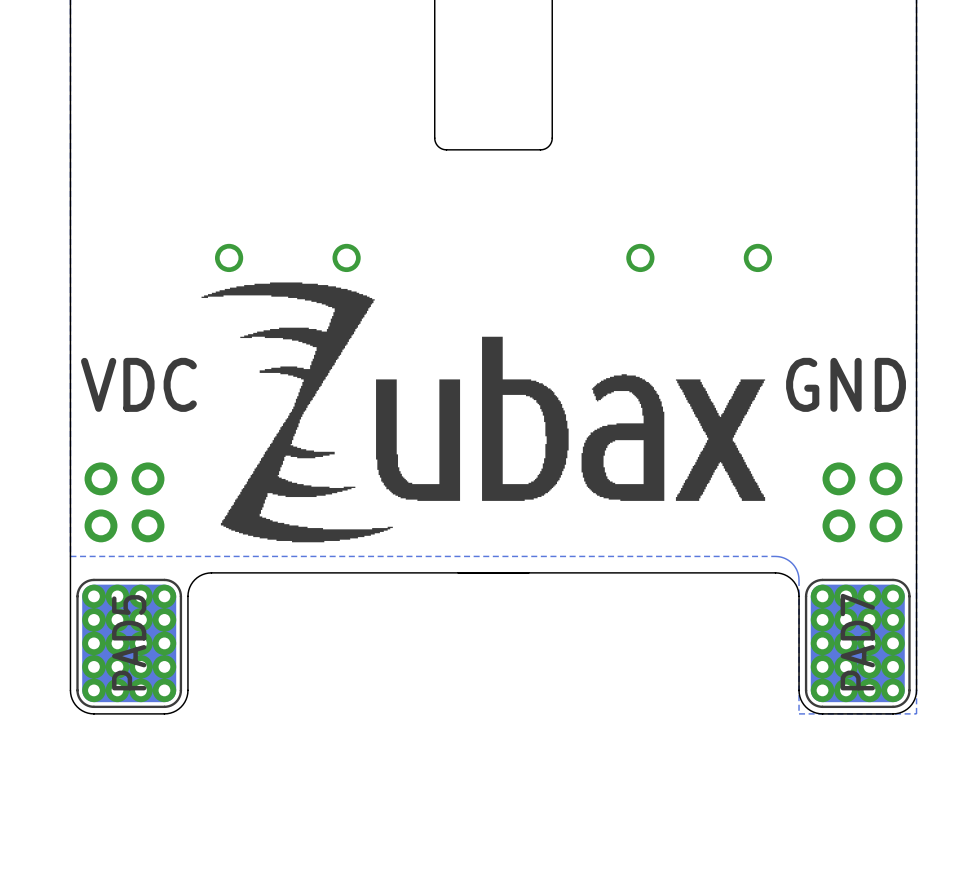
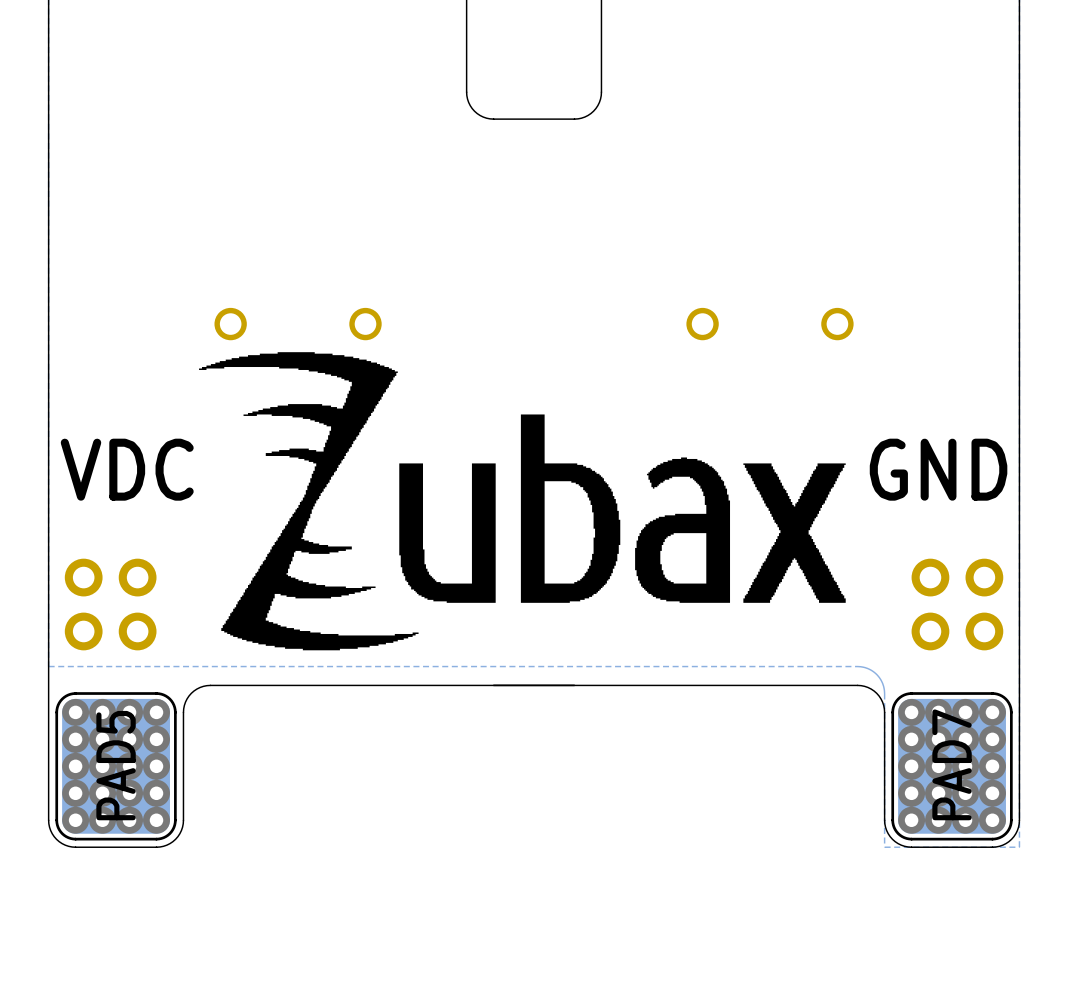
board edge: (552, 55) (552, 139) (548, 146) (540, 149) (446, 149) (438, 146) (434, 138) (434, 55) -> (601, 92) (599, 102) (593, 111) (584, 117) (574, 119) (486, 118) (472, 108) (466, 92)

